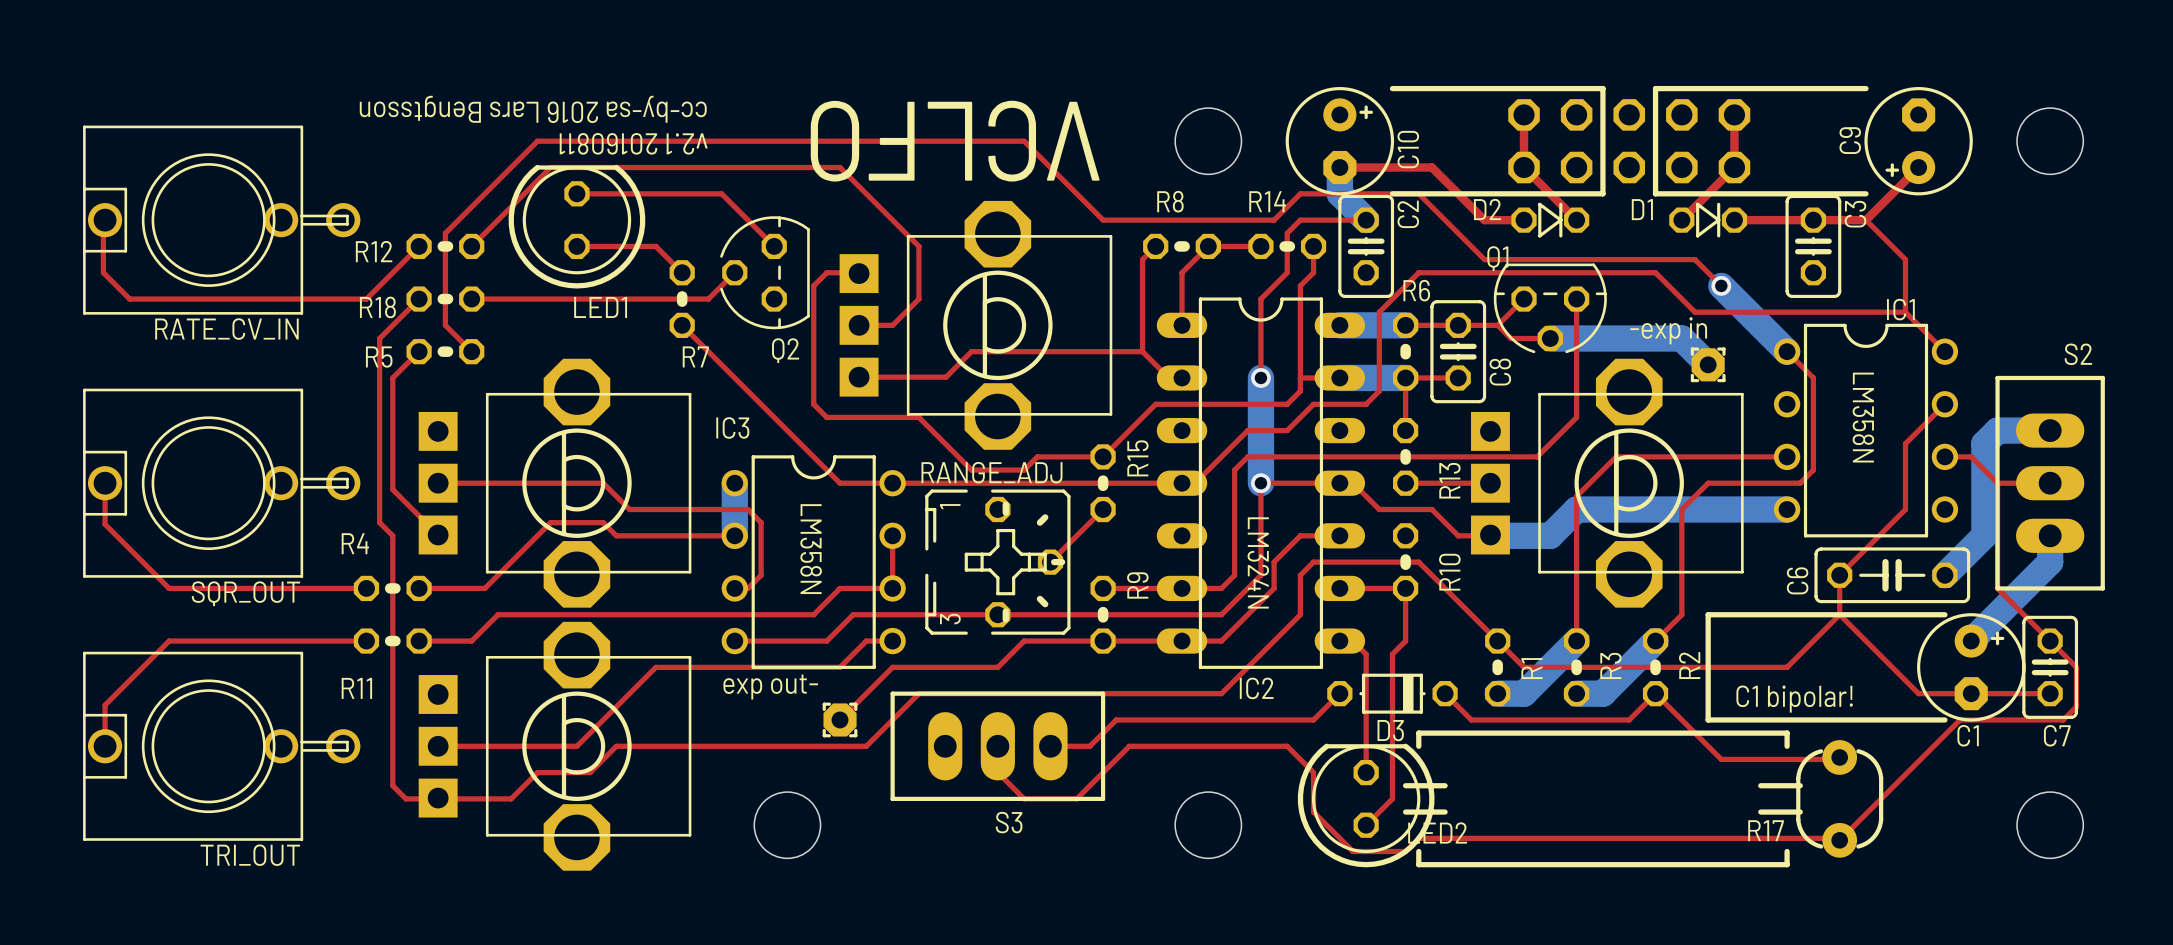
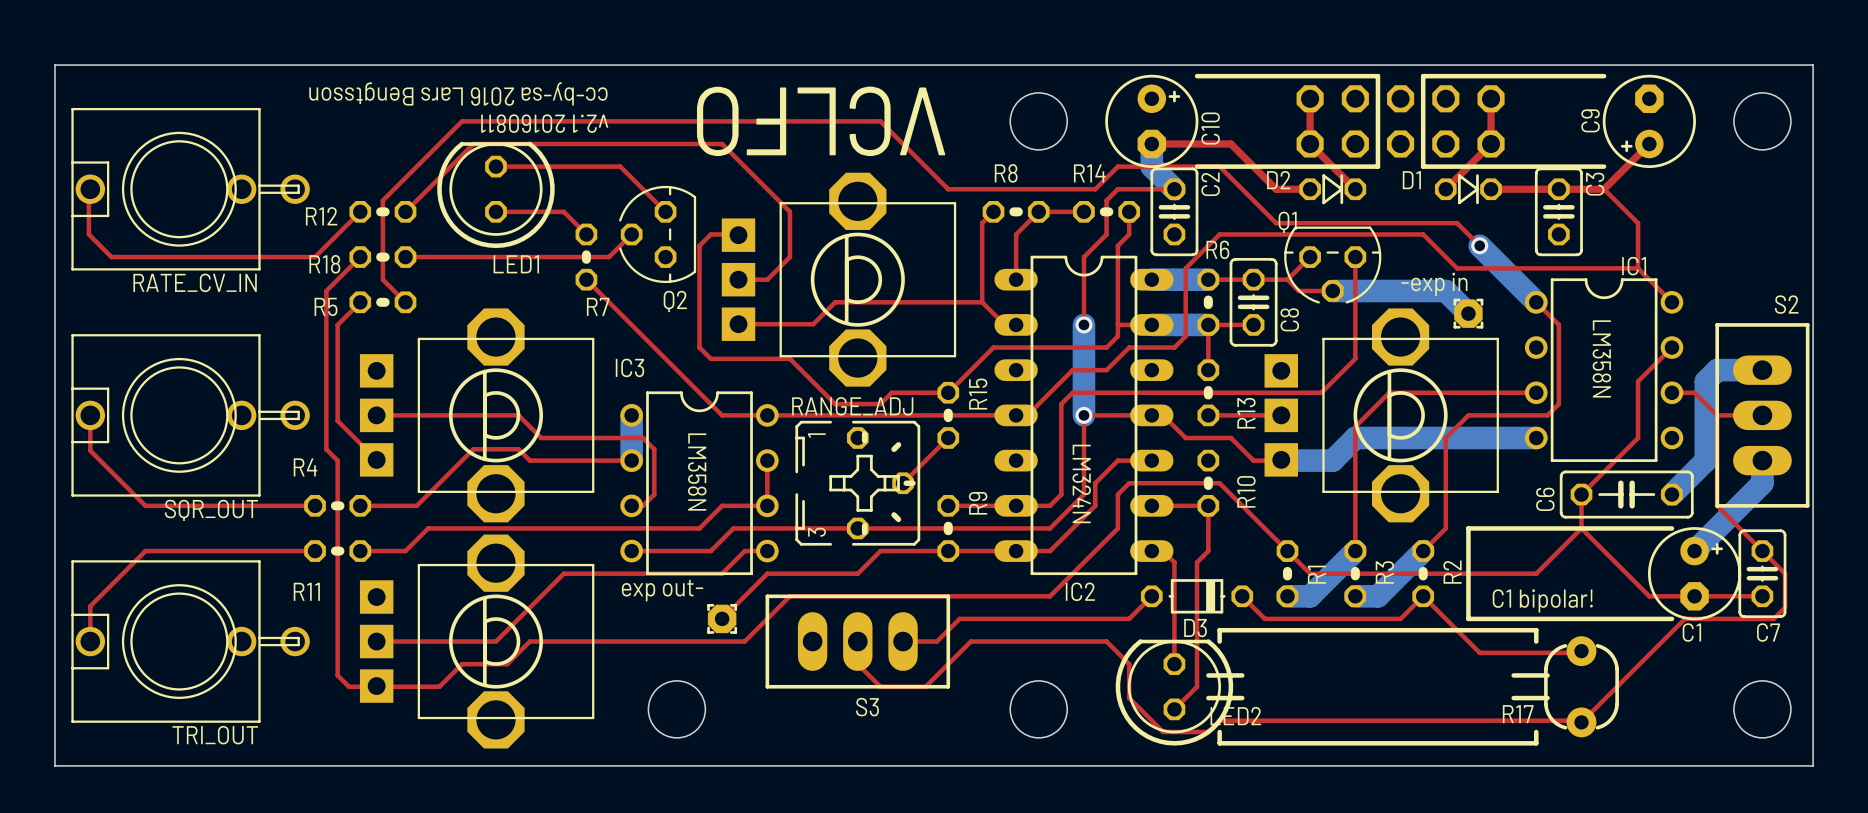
board edge: none -> (54, 65) (1813, 65) (1813, 765) (54, 765) (54, 65)

